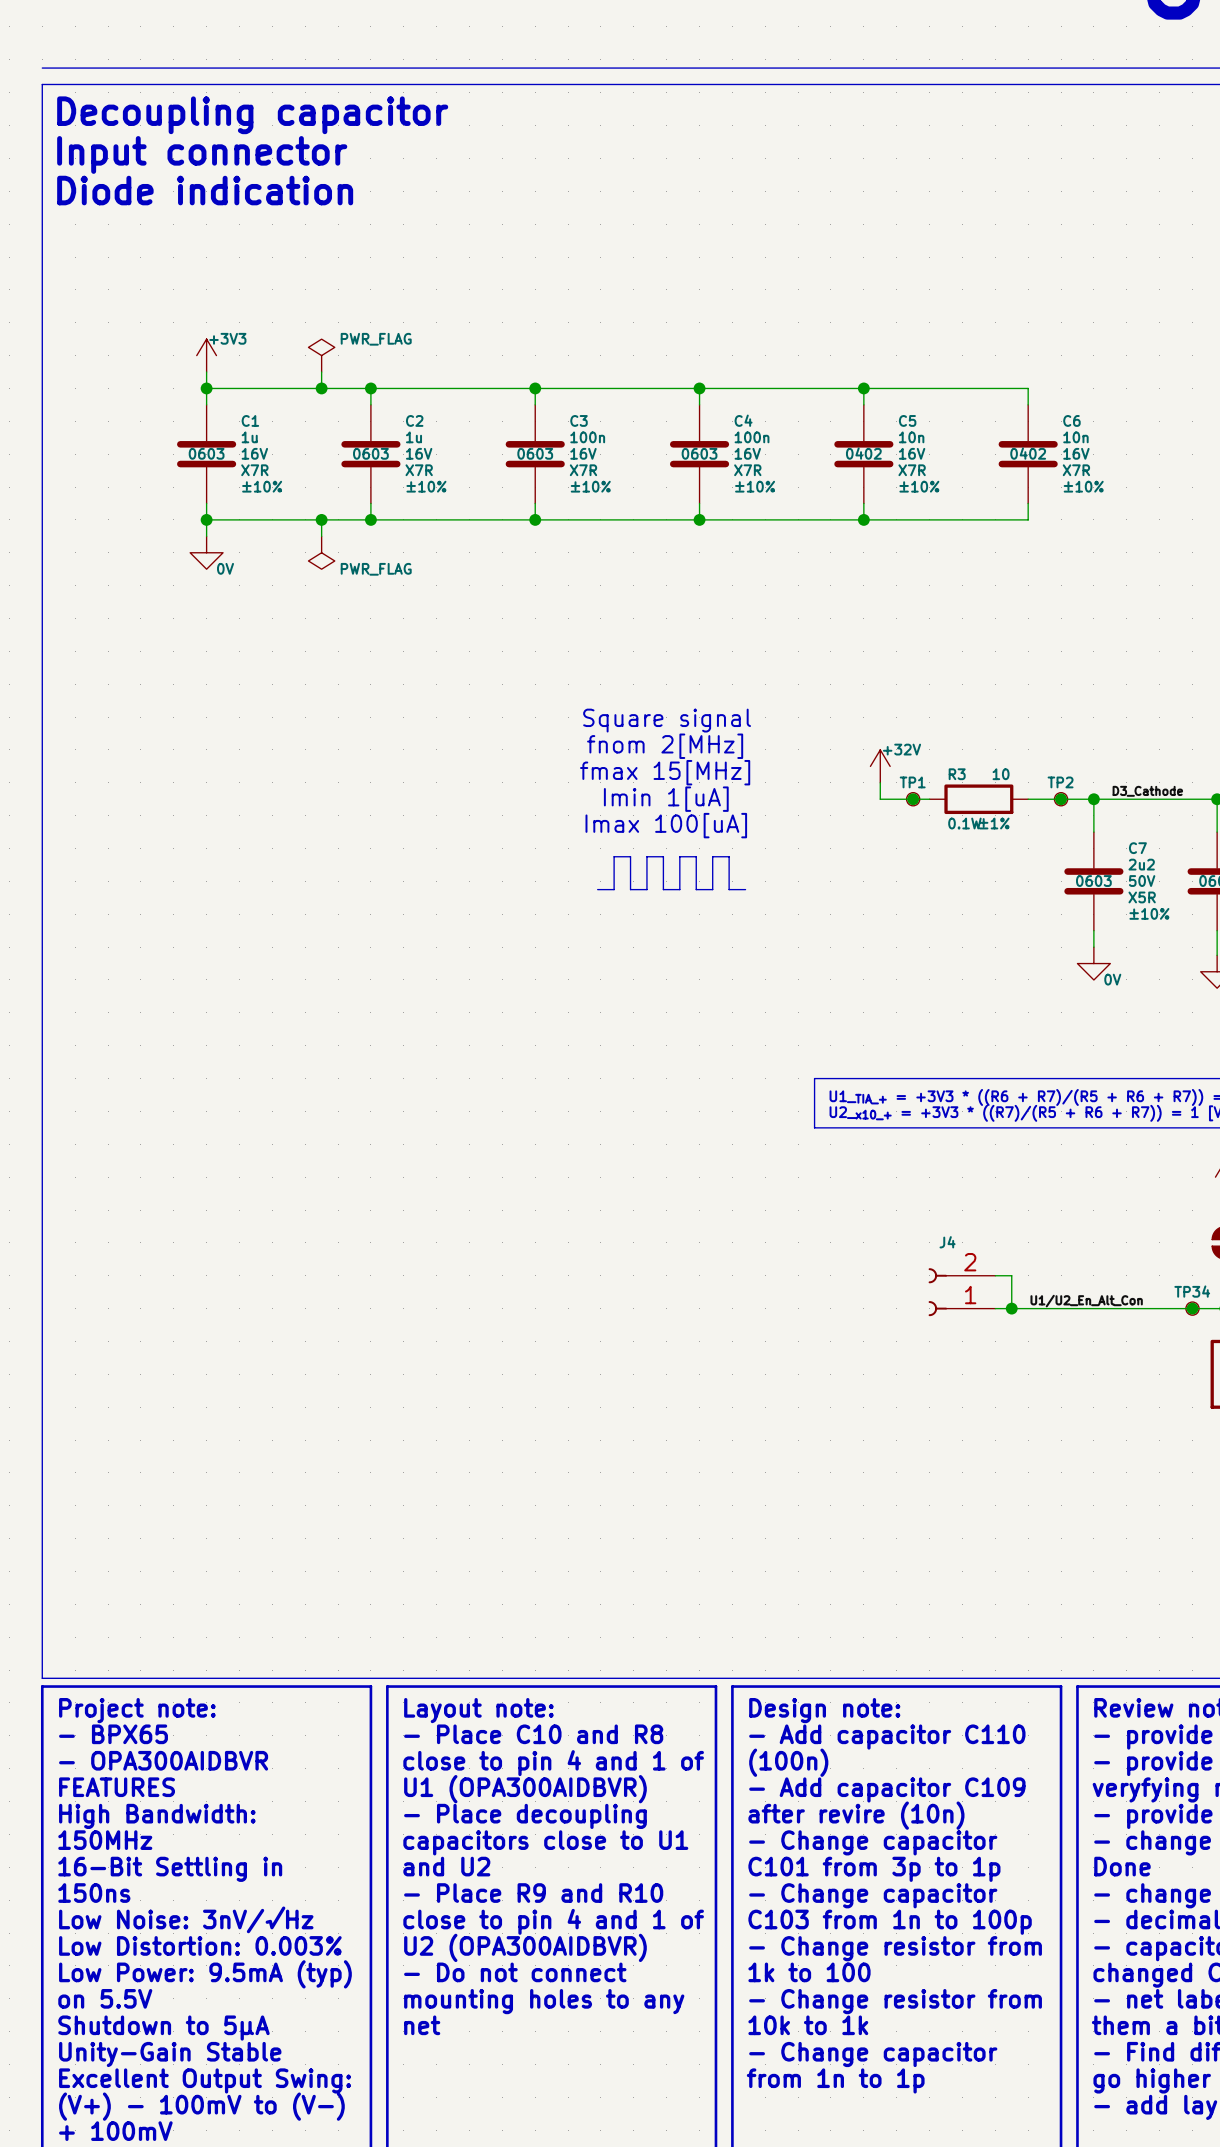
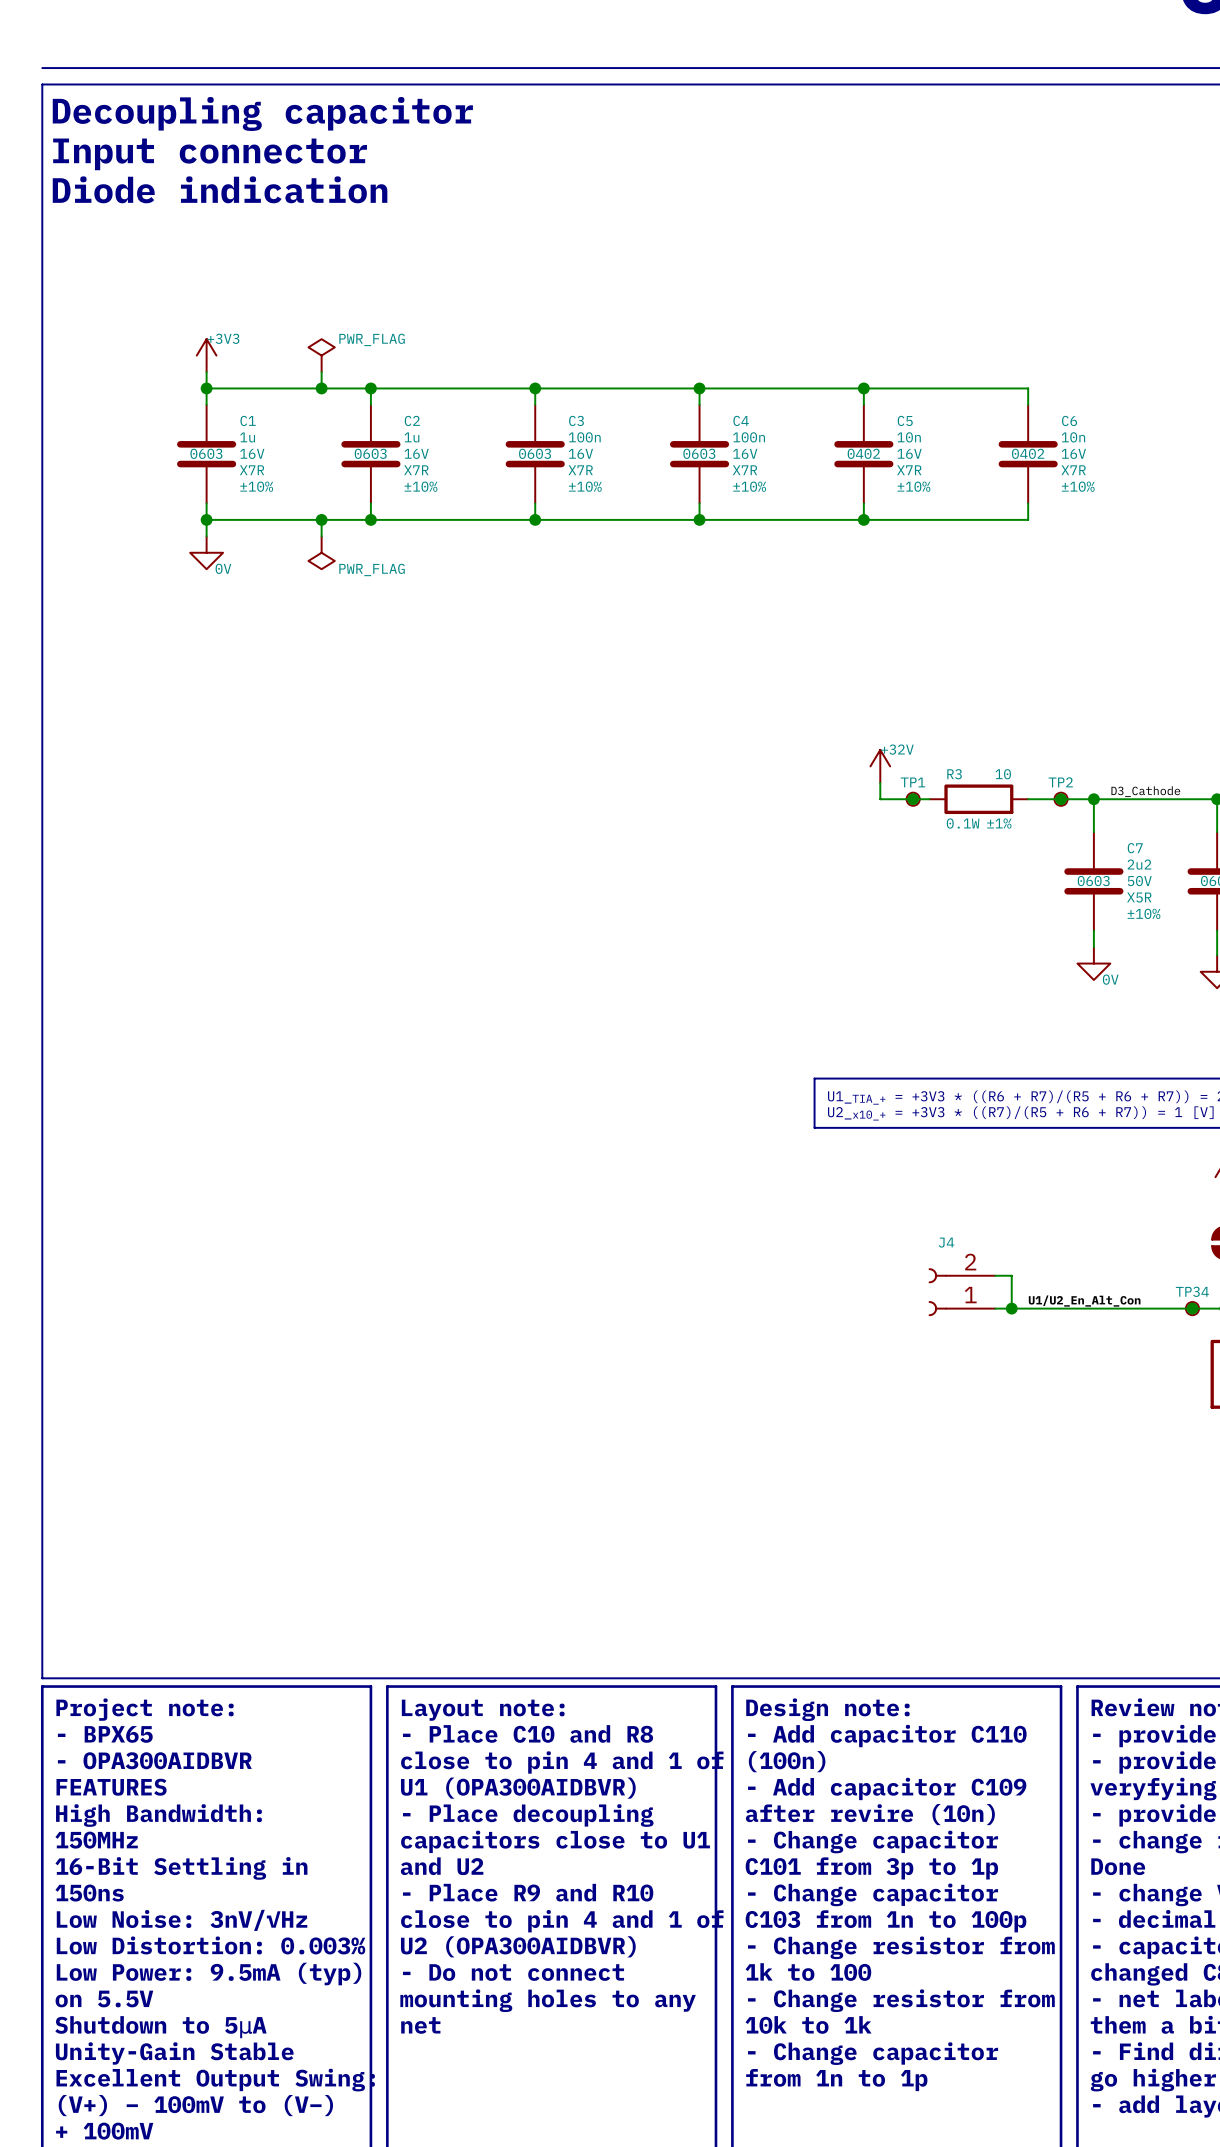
text: Square signal (667, 720) -> none
text: fnom 2[MHz] (665, 746) -> none
text: fmax 15[MHz] (665, 772) -> none
text: Imin 1[uA] (666, 799) -> none
text: Imax 100[uA] (666, 825) -> none
line: (597, 889) (614, 889) (614, 856) (630, 856) (630, 889) (646, 889) (646, 856) (663, 856) (663, 889) (679, 889) (679, 856) (696, 856) (696, 889) (712, 889) (712, 856) (729, 856) (729, 889) (745, 889) -> none

